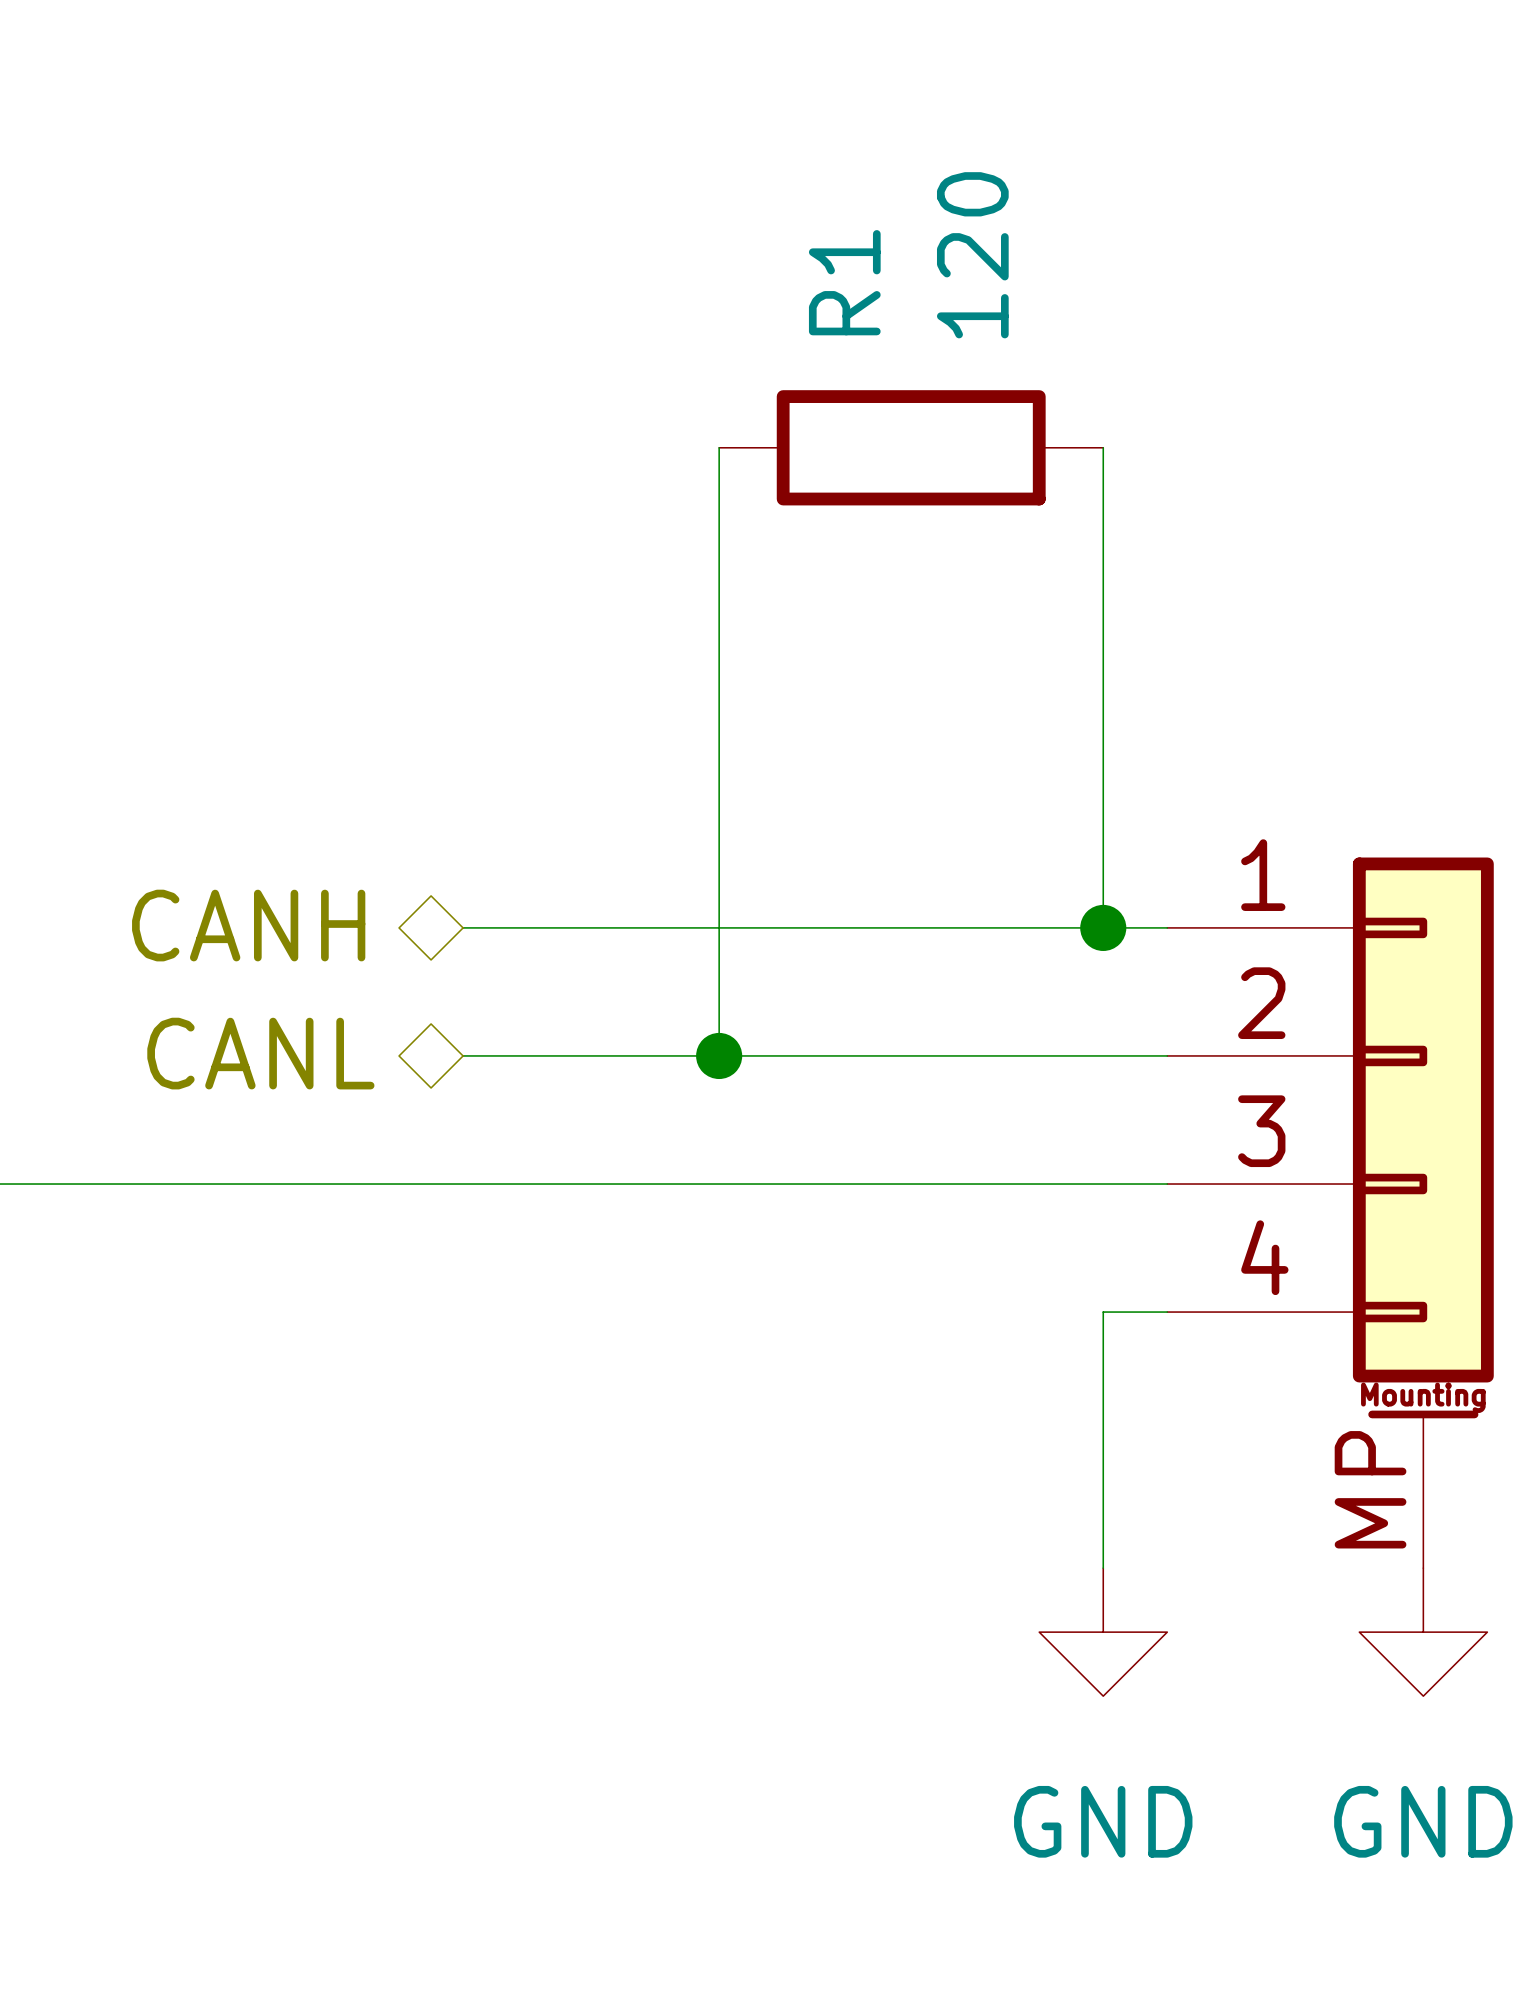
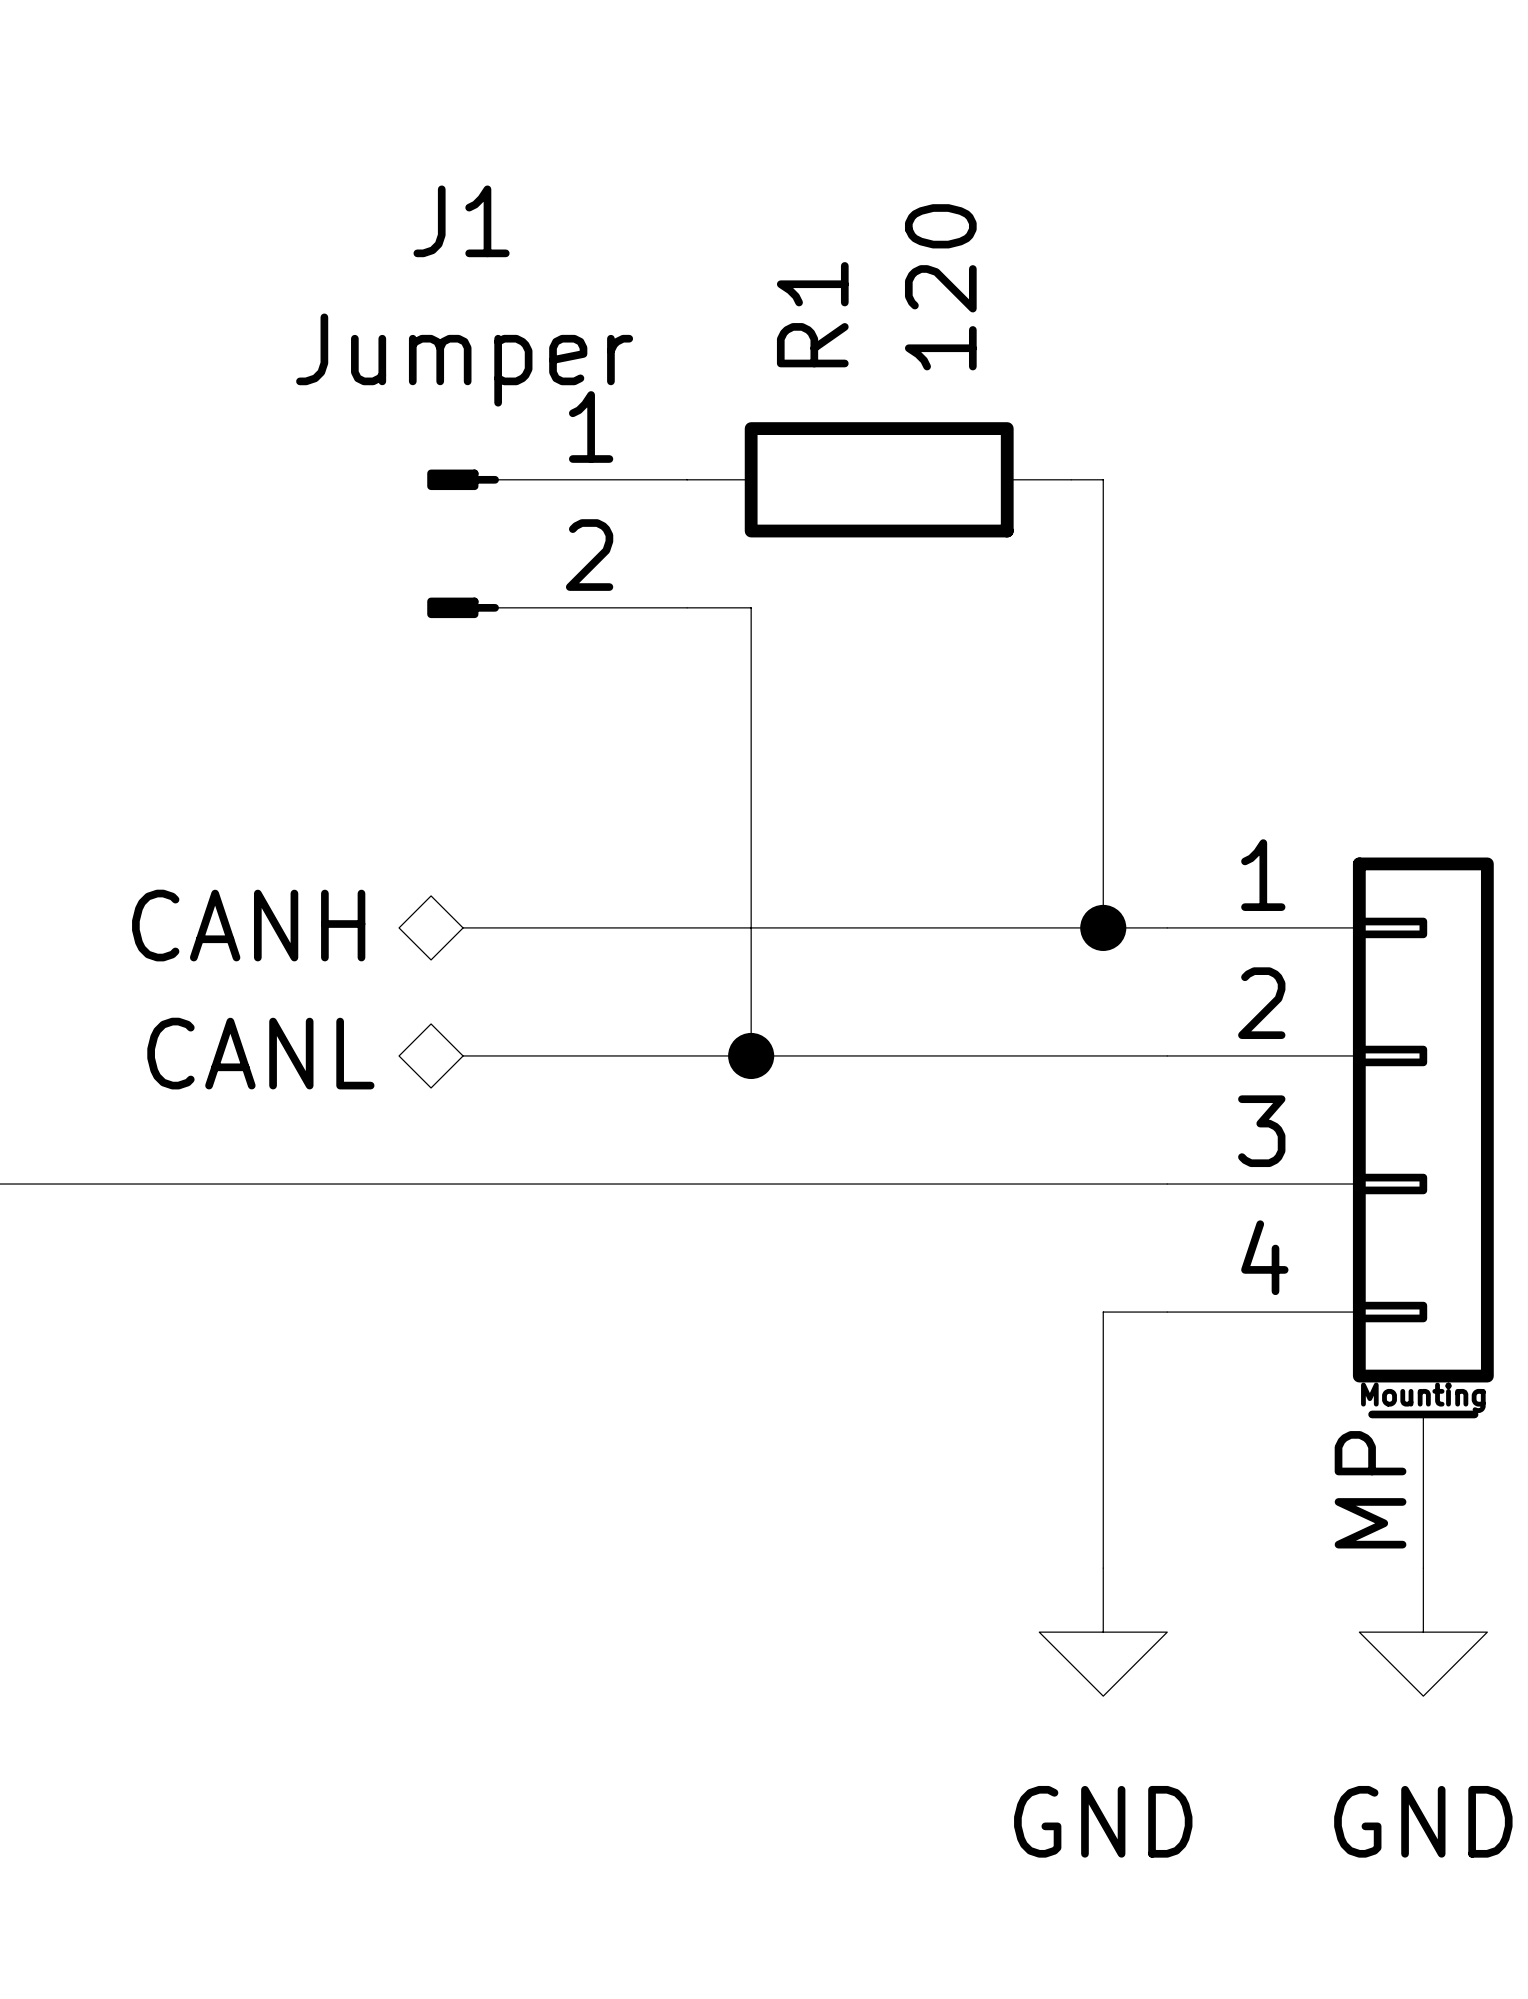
wire: (719, 447) (719, 1055) -> none
R1 position: (911, 447) -> (879, 479)
wire: (1103, 447) (1103, 479) -> (1071, 479) (1103, 479)
J1: none -> Jumper (557, 543)
wire: none -> (687, 607) (751, 607) (751, 1055)
junction position: (719, 1055) -> (751, 1055)

